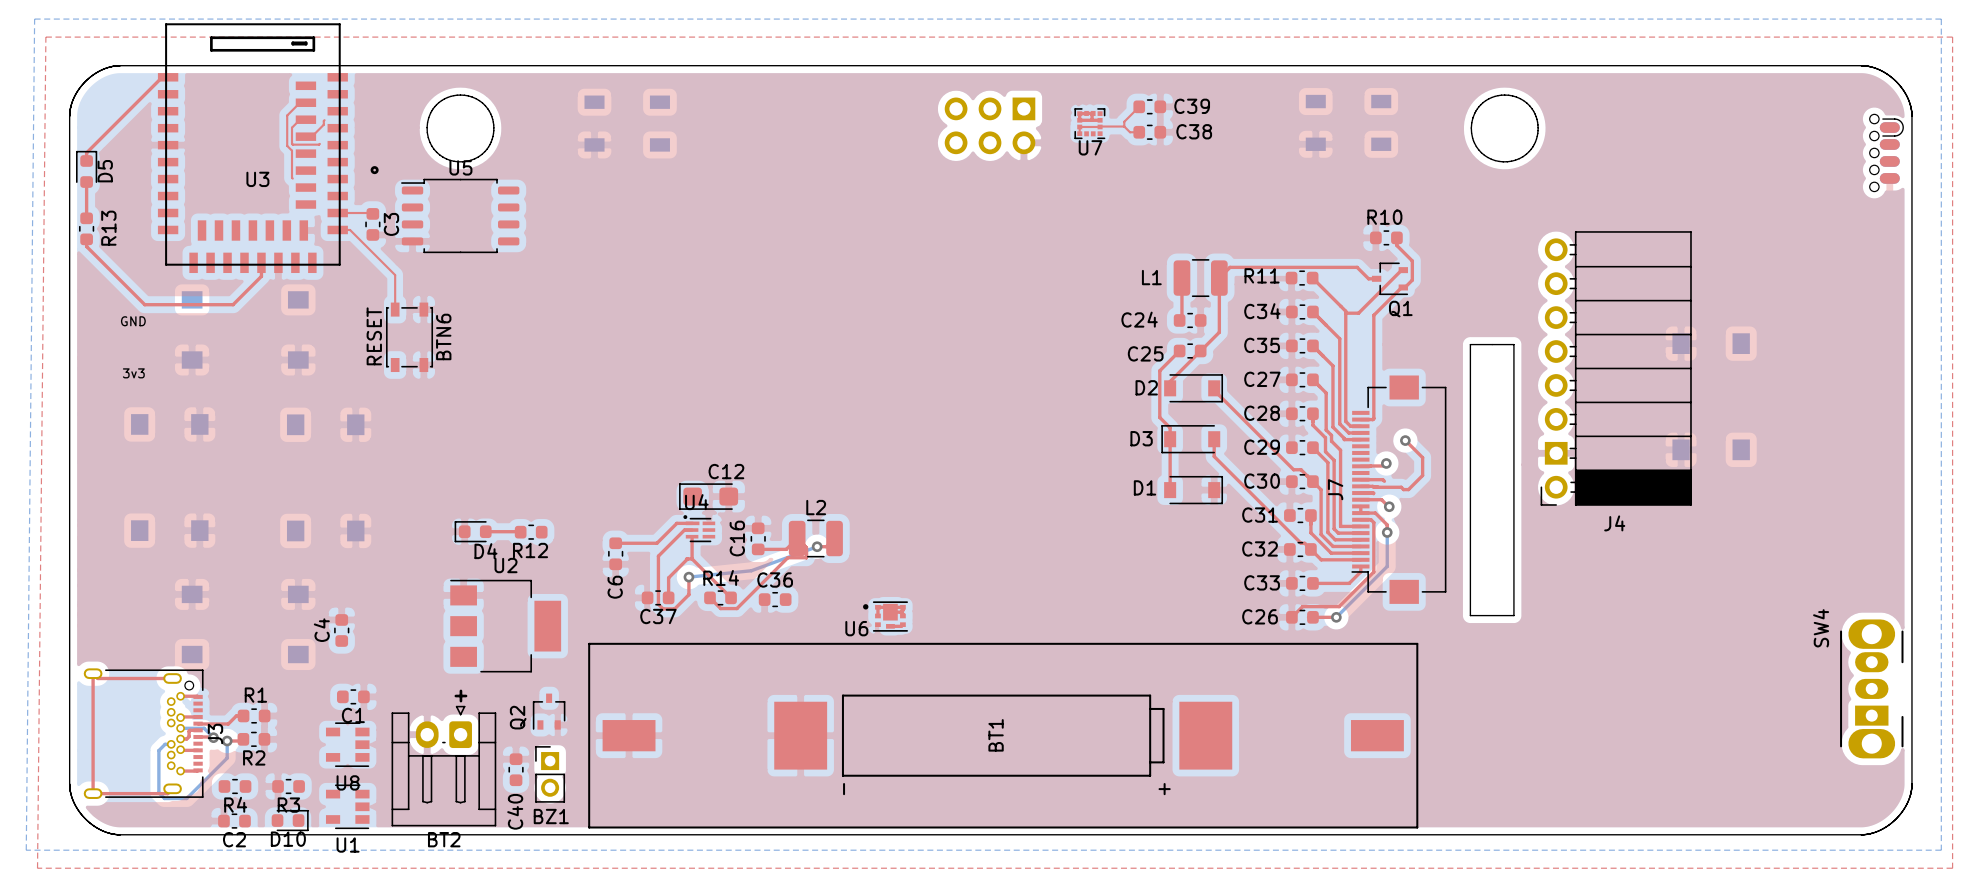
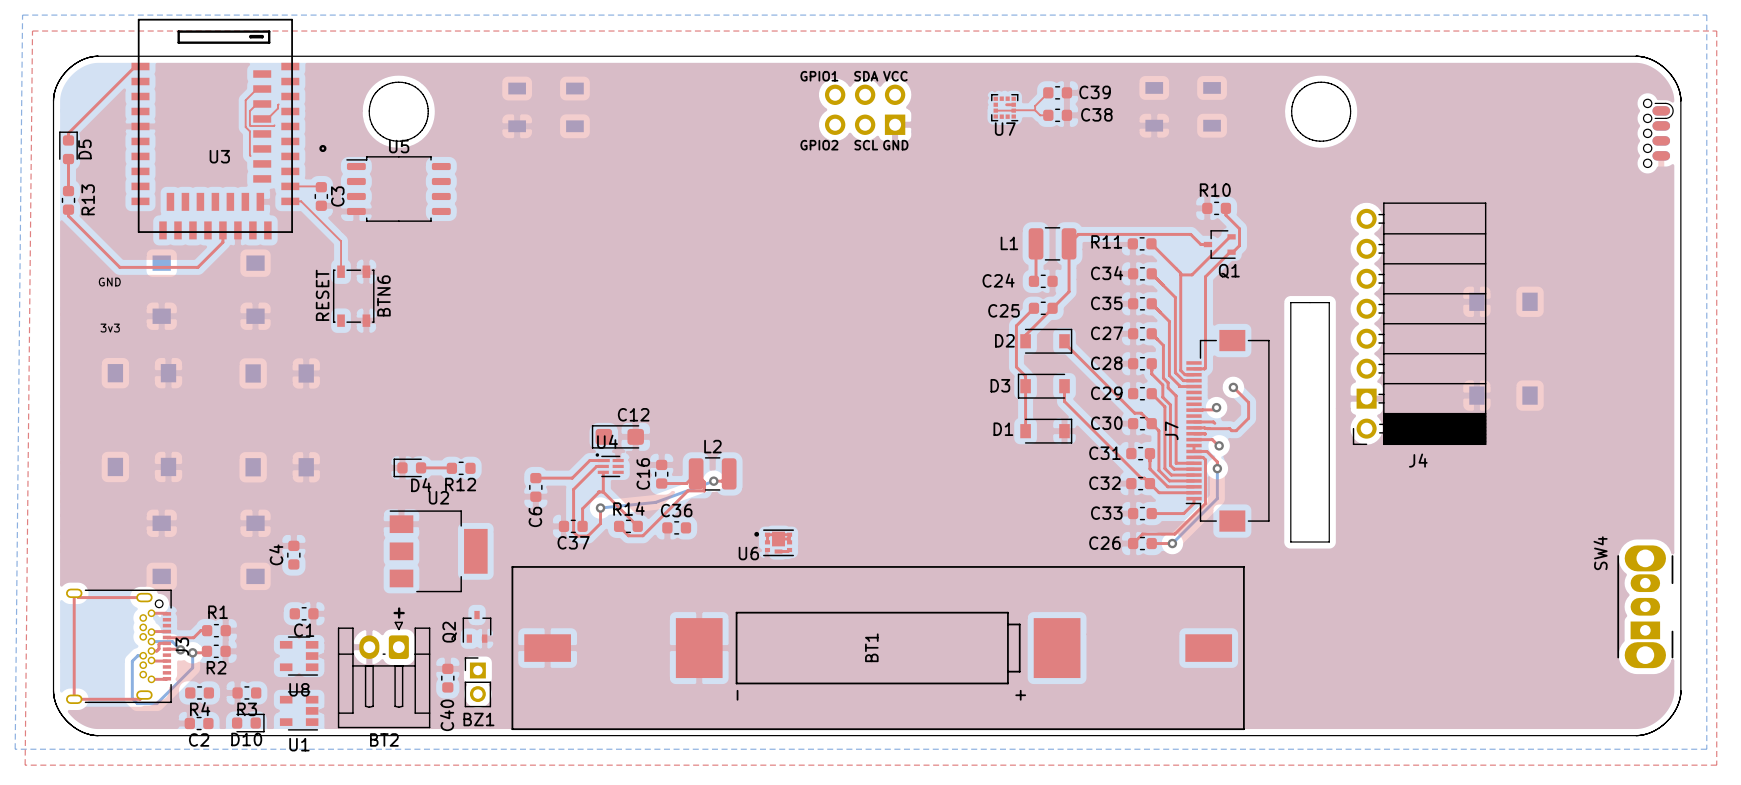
part footprint: [944, 97, 1036, 155] -> [824, 84, 906, 135]
top track: (1139, 106) (1124, 121) (1124, 126) -> (1048, 92) (1035, 106) (1035, 110)
C39 position: (1149, 106) -> (1057, 92)
top track: (1092, 113) (1079, 113) (1079, 120) (1100, 120) -> none
top track: (1092, 114) (1092, 120) -> none
top track: none -> (1006, 104) (1013, 104)
U7 position: (1089, 123) -> (1004, 107)
top track: (1124, 126) (1130, 132) (1137, 132) -> (1035, 110) (1040, 115) (1046, 115)
top track: (1124, 126) (1079, 126) (1079, 133) -> none
top track: none -> (1035, 110) (995, 110)
C38 position: (1149, 132) -> (1057, 115)

